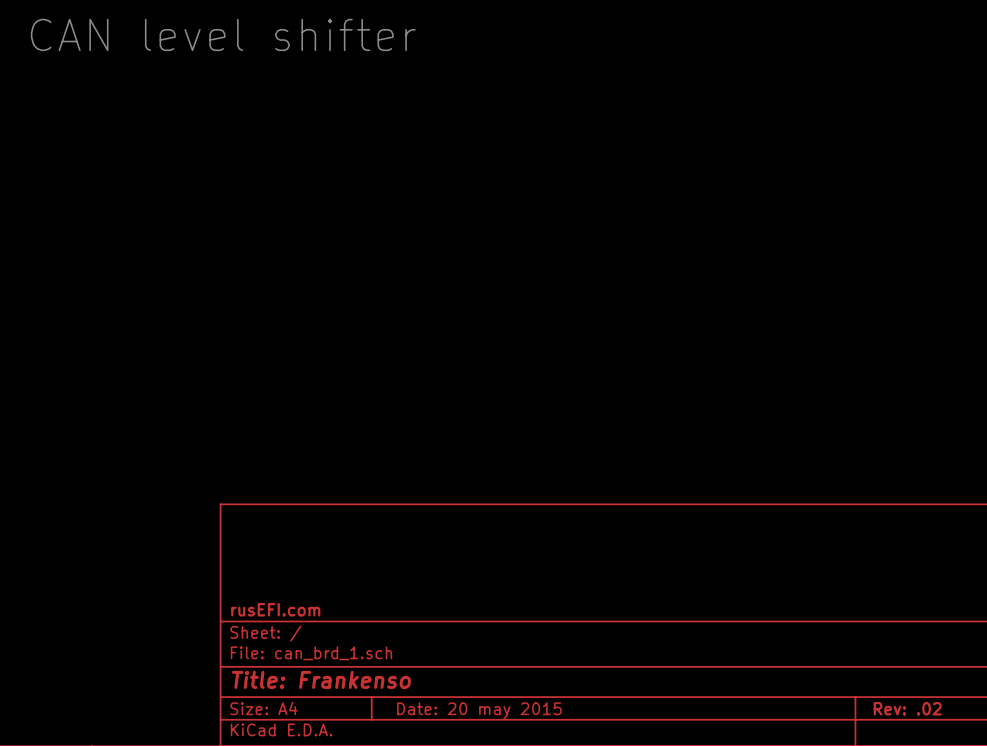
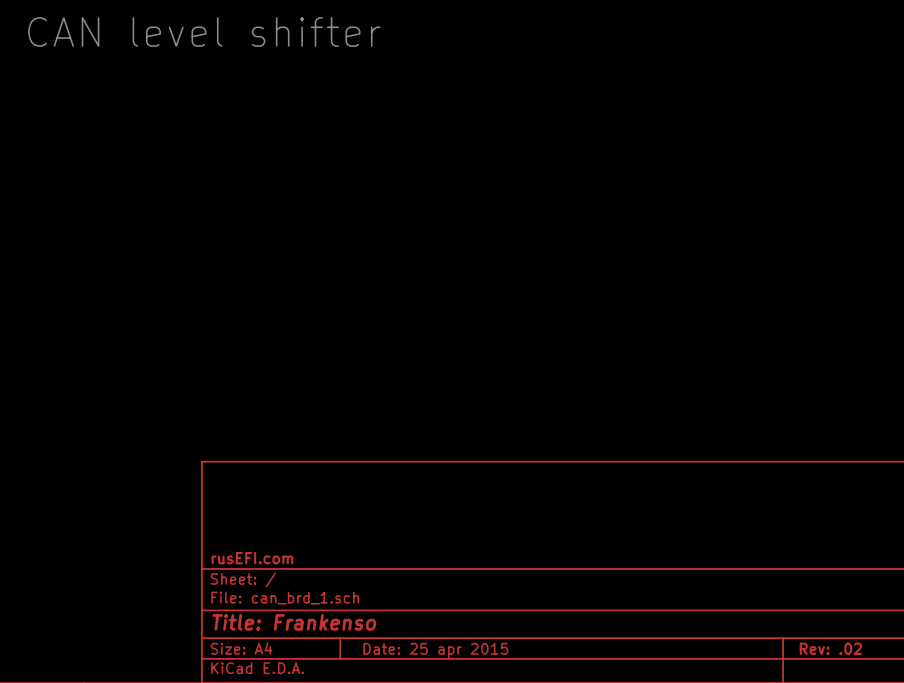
title block: Date: 20 may 2015 (479, 710) -> Date: 25 apr 2015 (435, 650)

